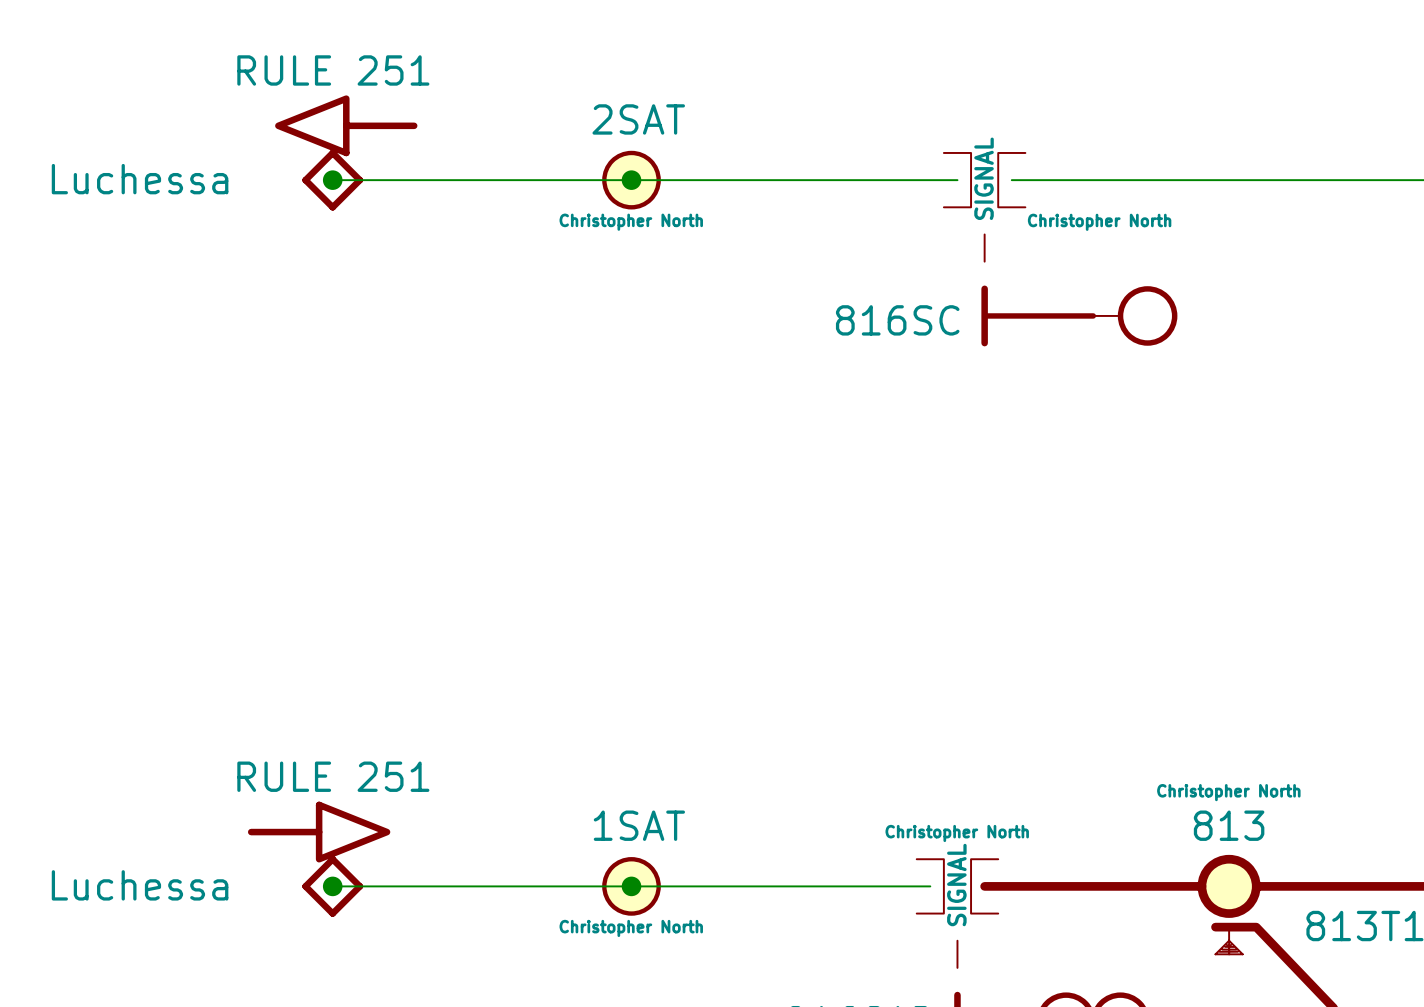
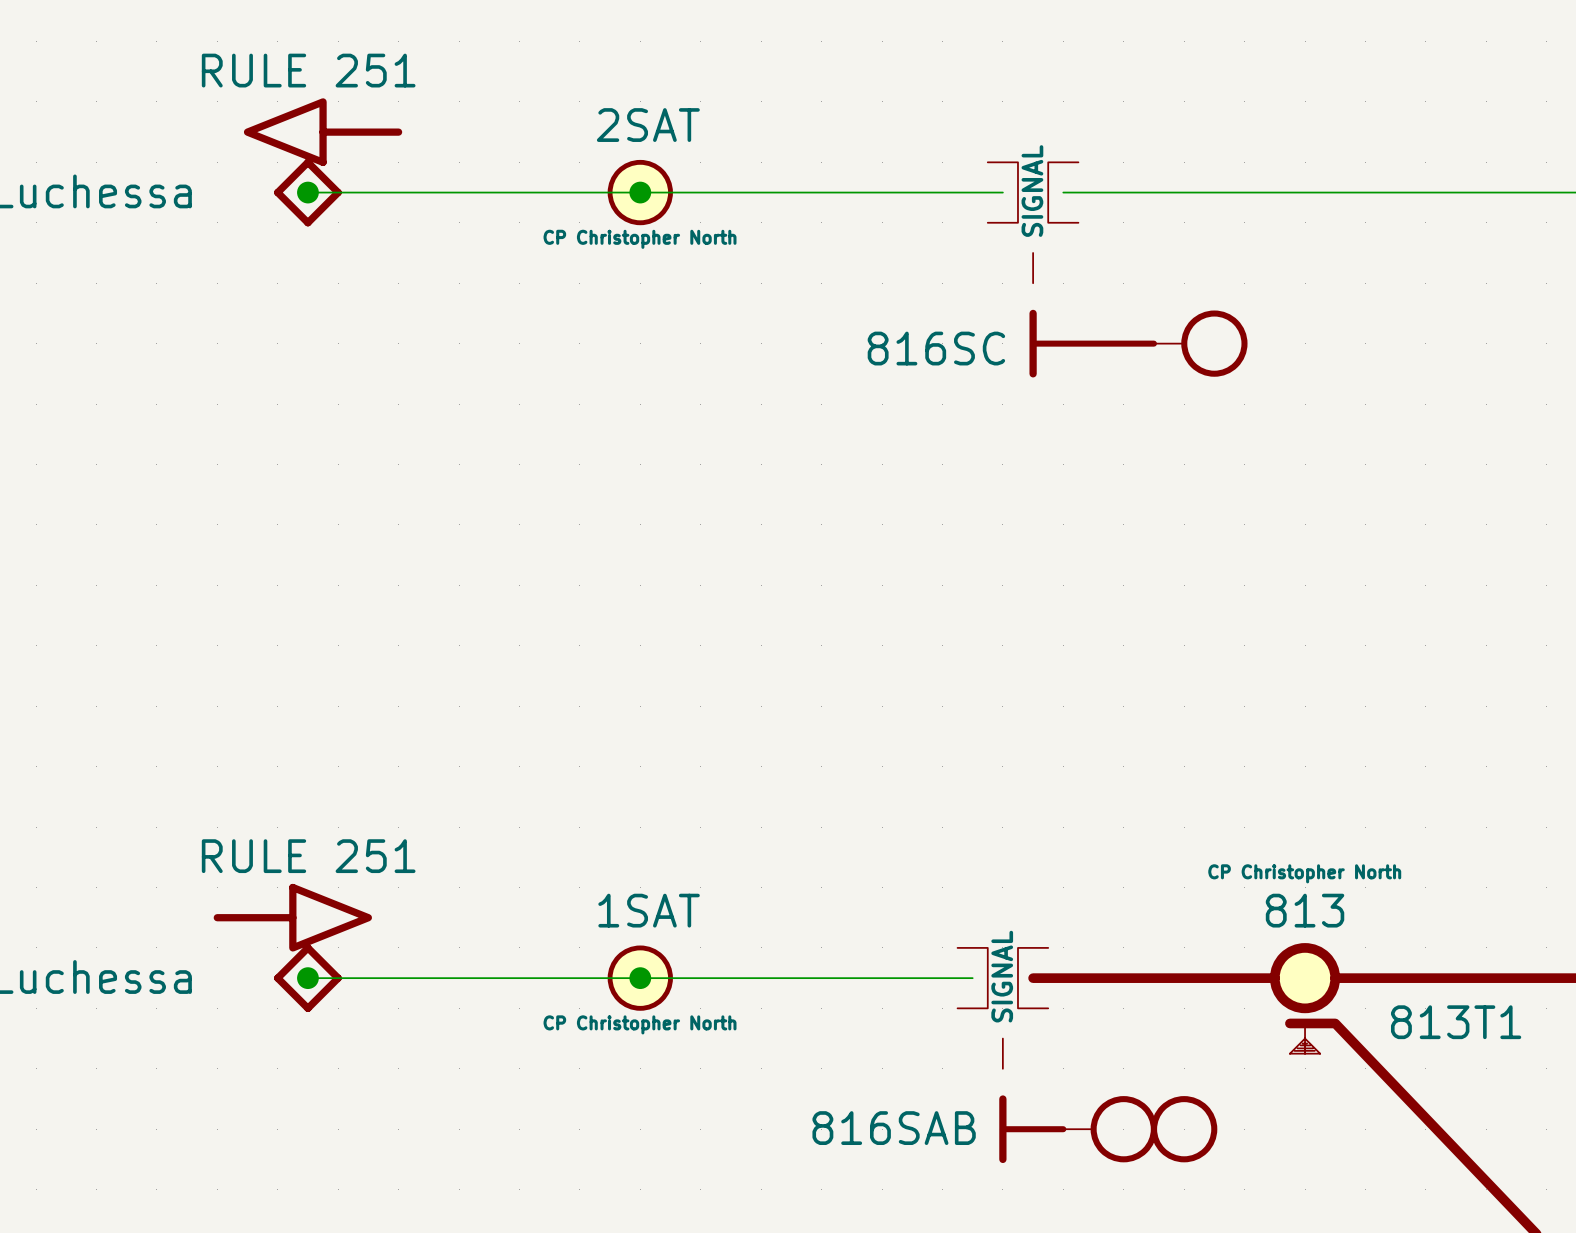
part text: Christopher North (631, 222) -> CP Christopher North (640, 239)
part text: Christopher North (1099, 222) -> none
part text: Christopher North (1228, 792) -> CP Christopher North (1304, 873)
part text: Christopher North (957, 833) -> none
part text: Christopher North (631, 928) -> CP Christopher North (640, 1024)

